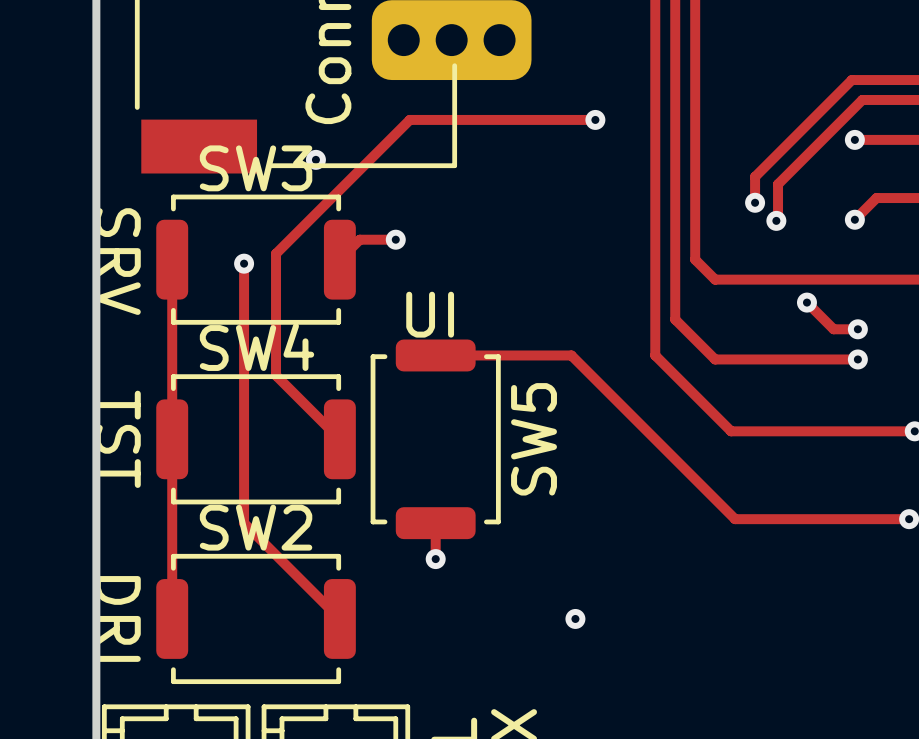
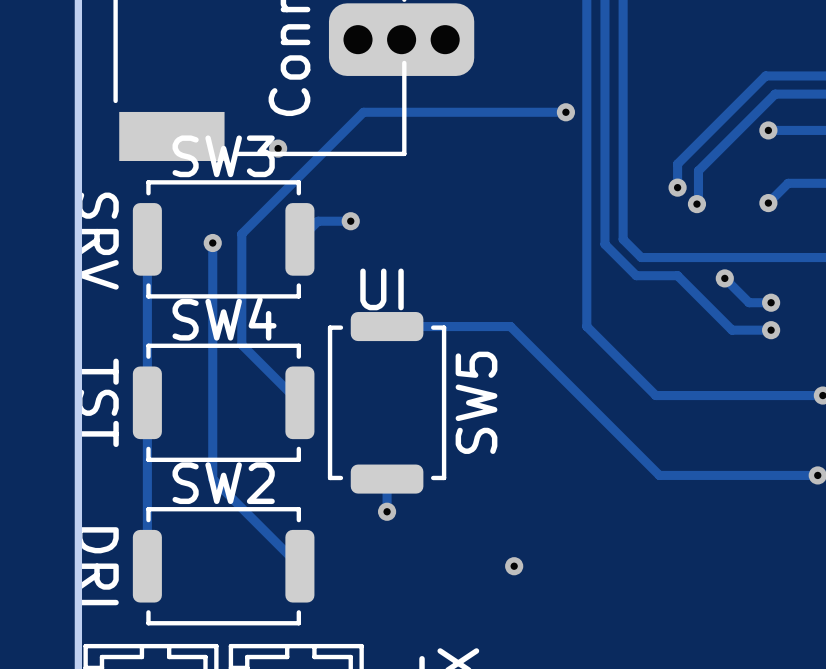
track: none -> (532, 112) (565, 112)
via position: (595, 119) -> (565, 112)
track: (675, 265) (675, 319) (715, 359) (814, 359) -> (604, 244) (636, 275) (677, 275) (732, 330)

